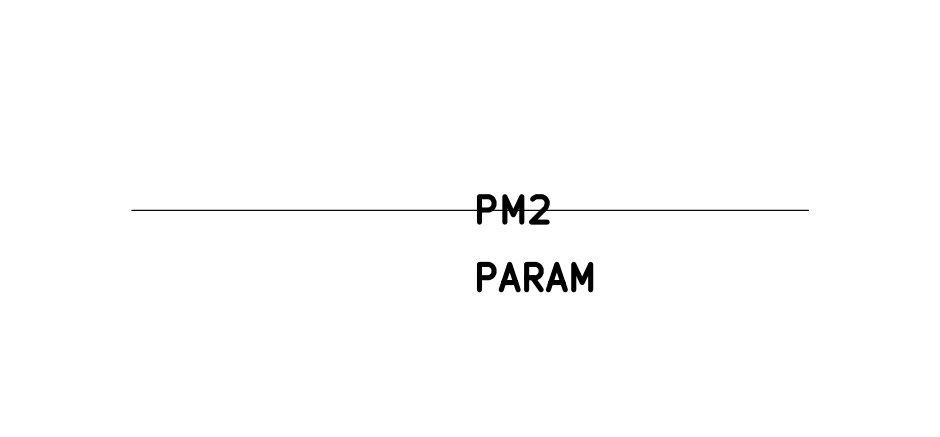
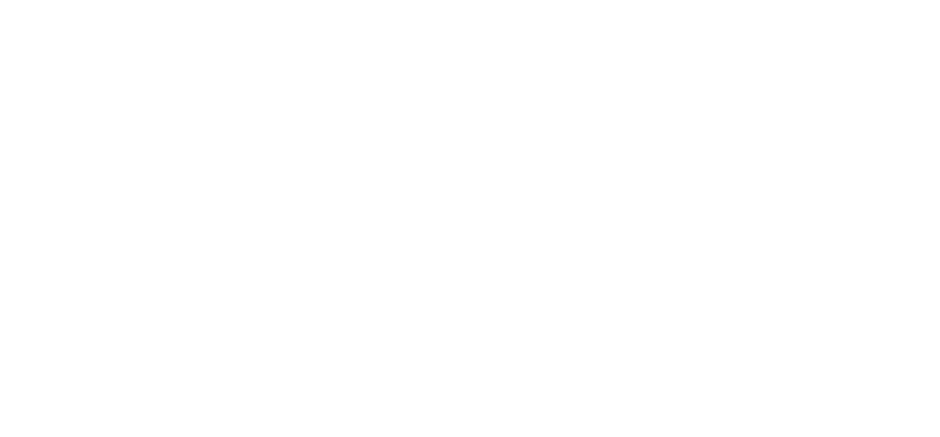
PM2: PARAM (470, 210) -> none

